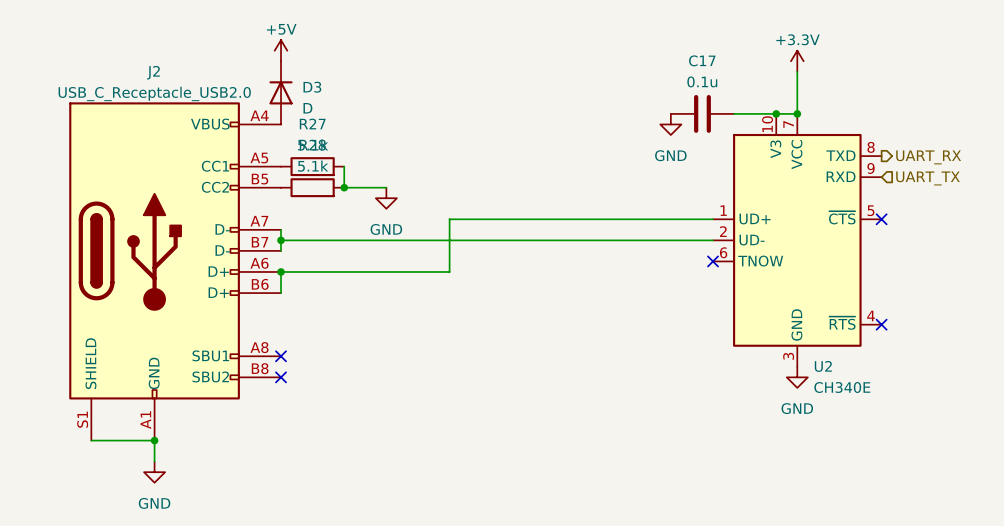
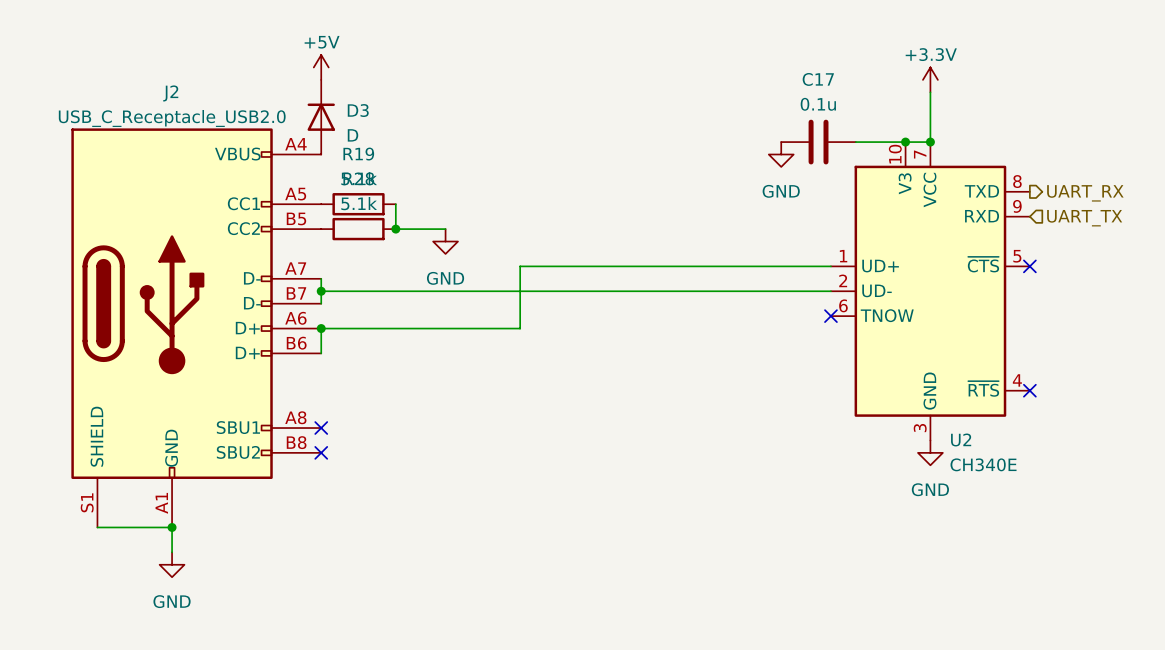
R27 name: R27 (312, 123) -> R19 (358, 154)

